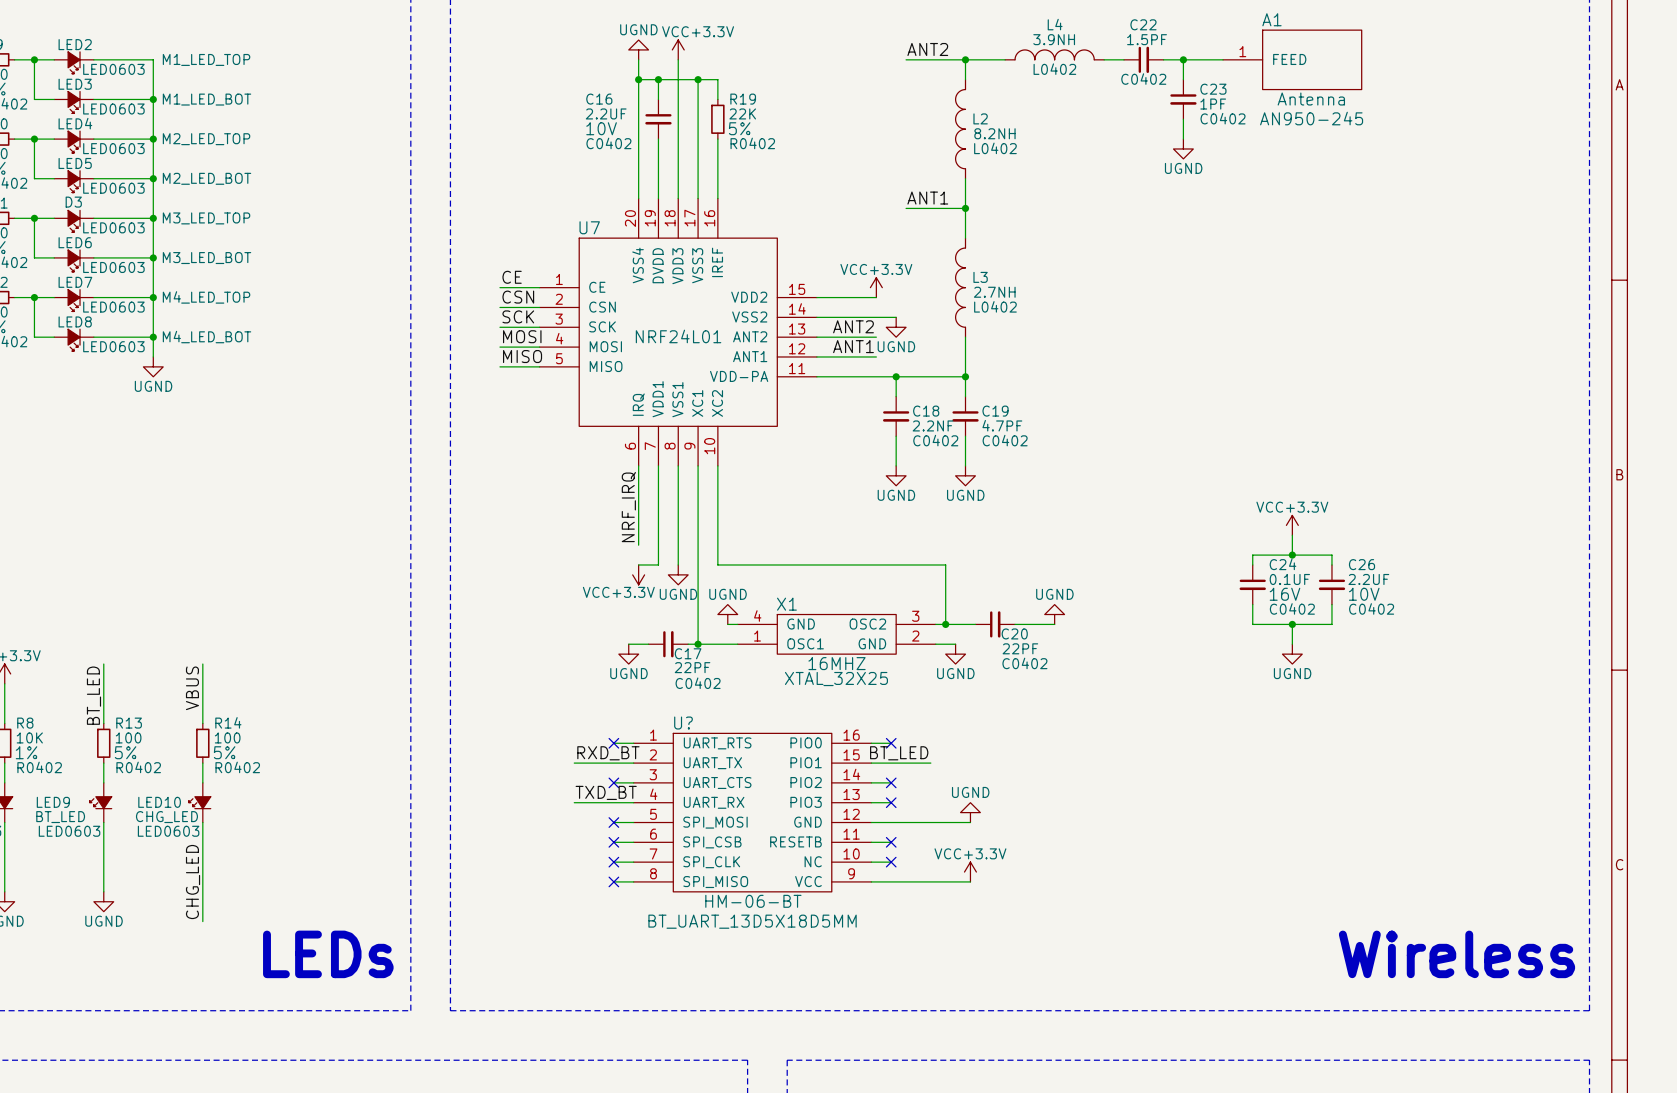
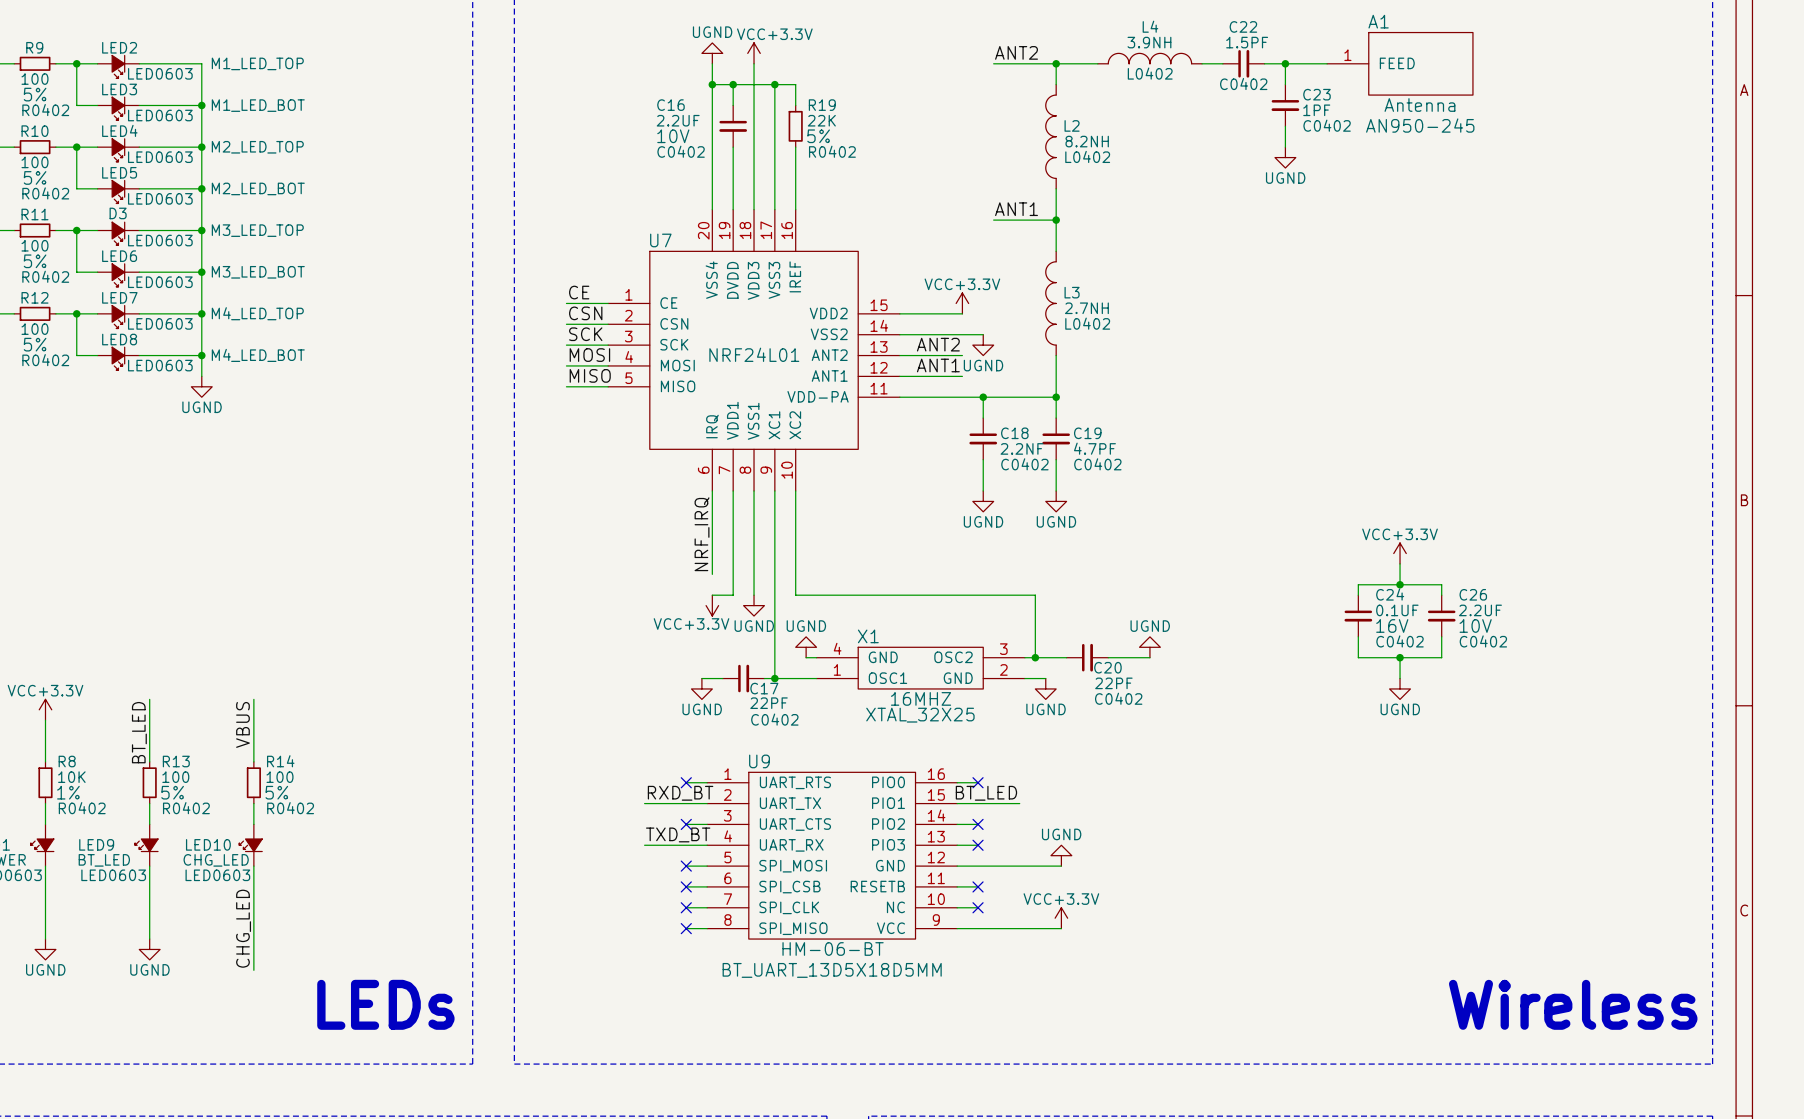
U? name: U? (683, 723) -> U9 (759, 761)

